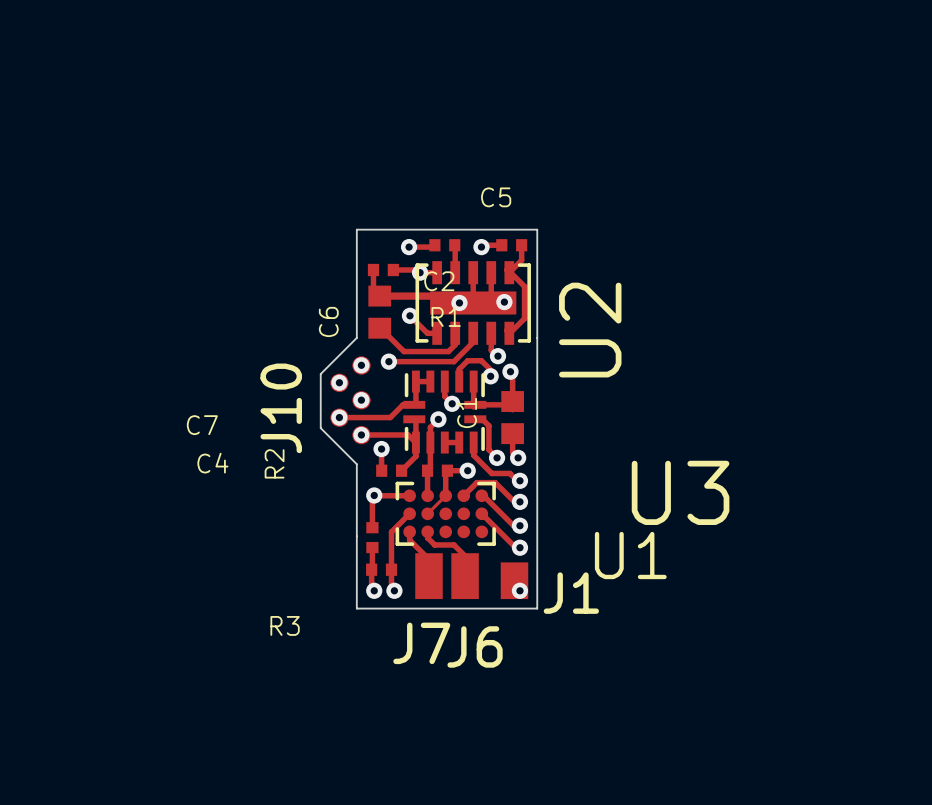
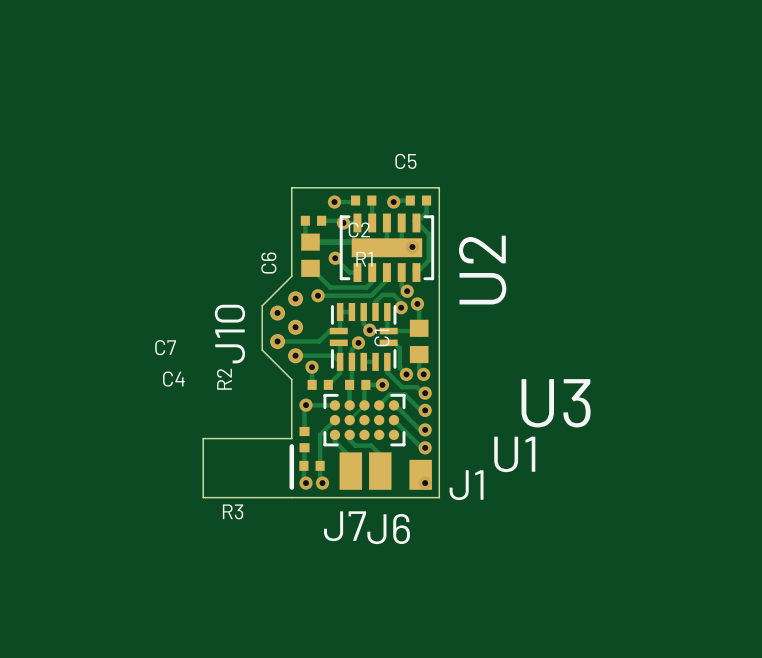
via: (459, 302) -> none
board edge: (356, 536) (356, 608) -> (291, 438) (203, 438) (203, 497) (291, 497)
line: none -> (291, 446) (291, 487)

